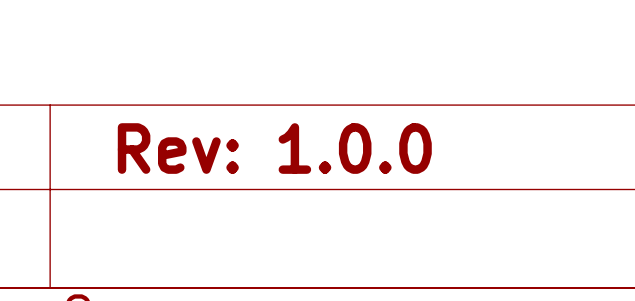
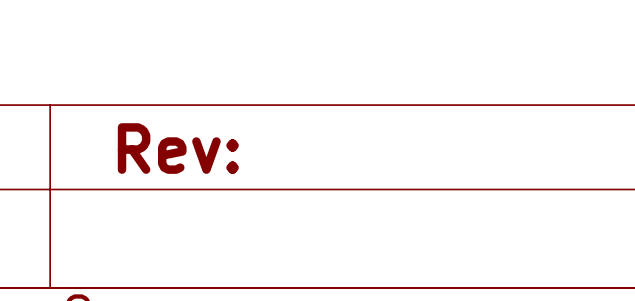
title block: Rev: 1.0.0 (274, 148) -> Rev: (178, 148)

